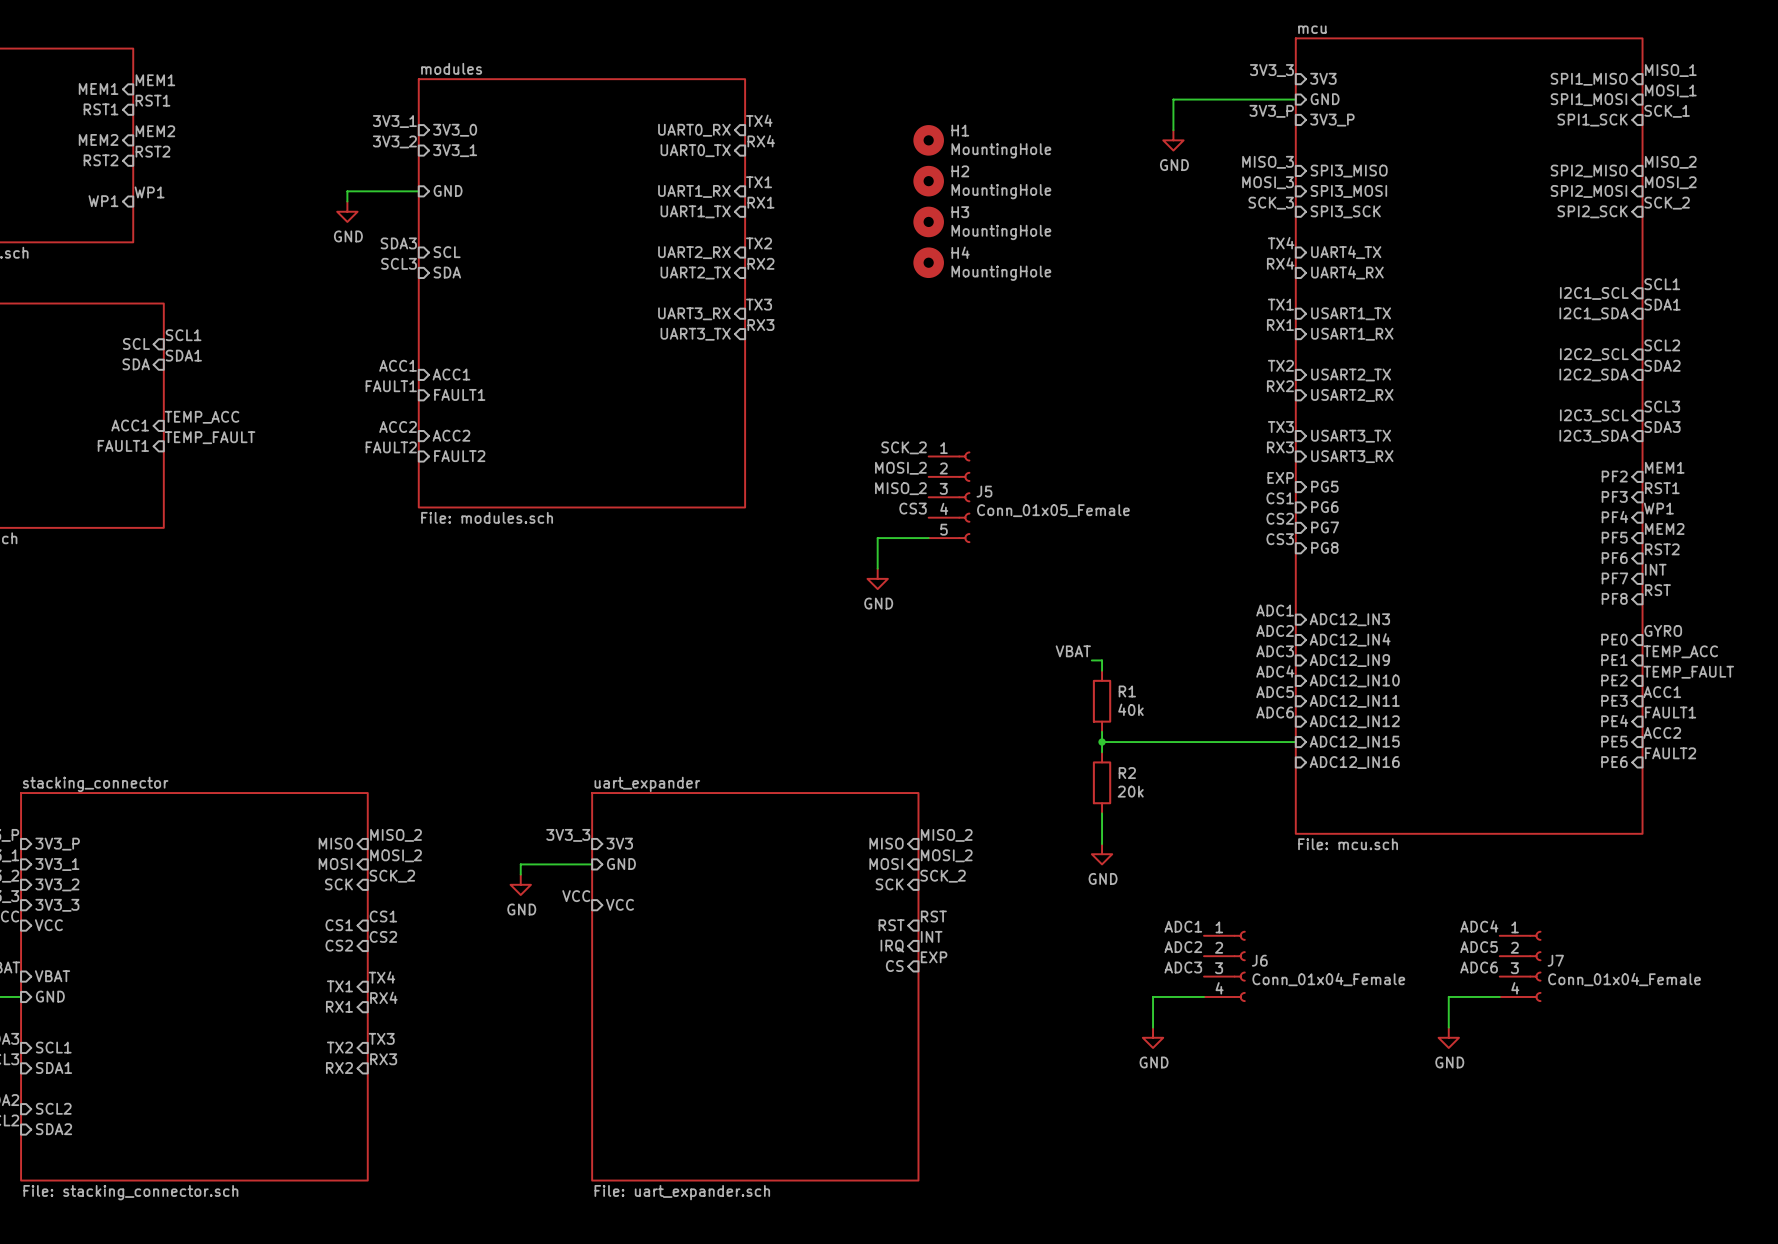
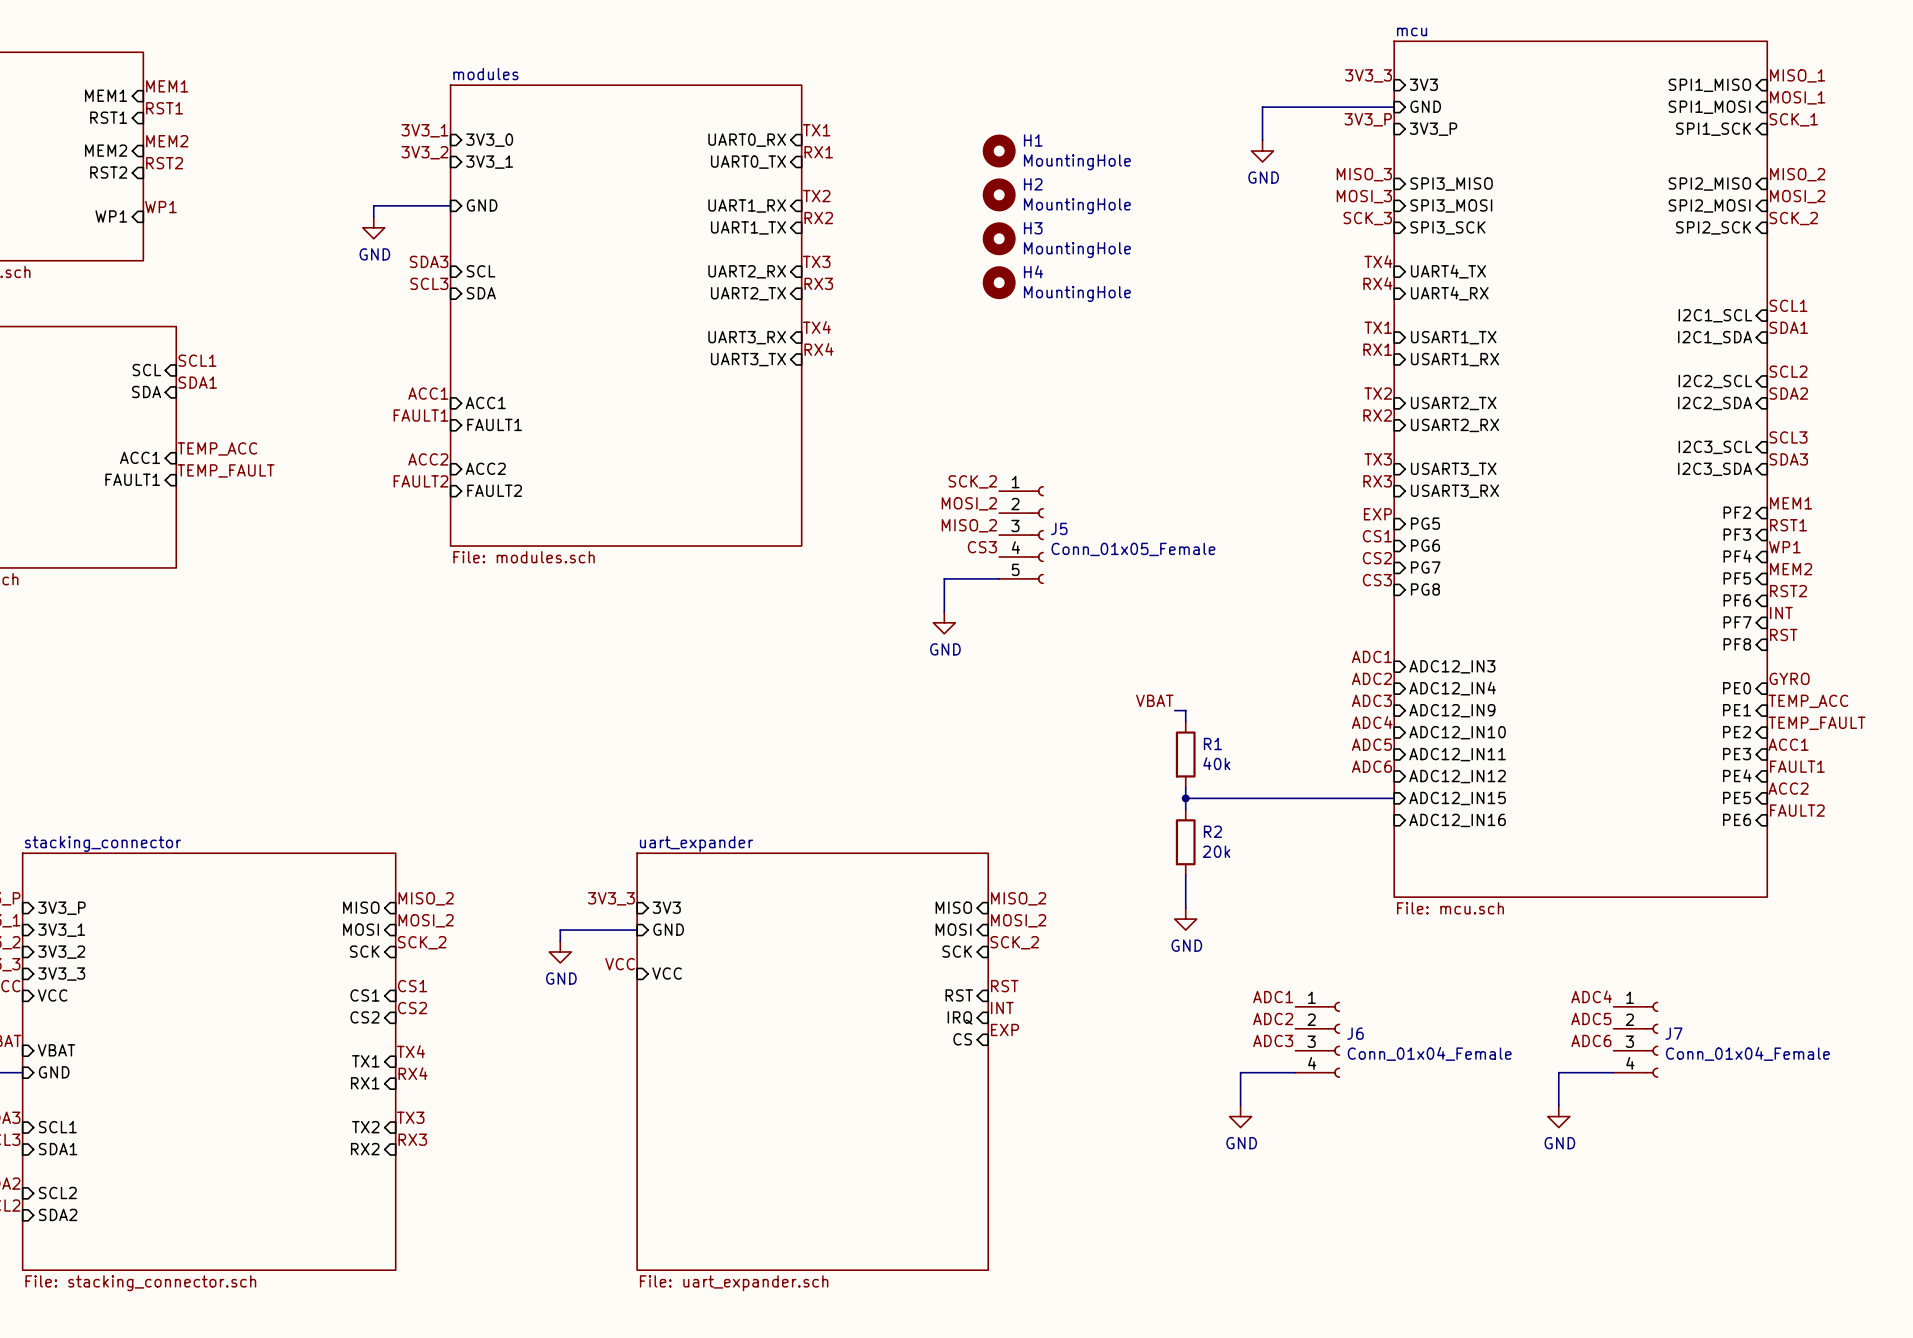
label: TX4 (759, 120) -> TX1 (816, 130)
label: RX4 (761, 141) -> RX1 (818, 152)
label: TX1 (759, 182) -> TX2 (816, 196)
label: RX1 (760, 202) -> RX2 (818, 218)
label: TX2 (759, 243) -> TX3 (816, 261)
label: RX2 (760, 263) -> RX3 (818, 283)
label: TX3 (759, 304) -> TX4 (816, 327)
label: RX3 (760, 325) -> RX4 (819, 349)

